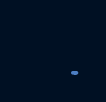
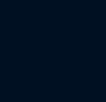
bottom track: (72, 72) (76, 72) -> none

